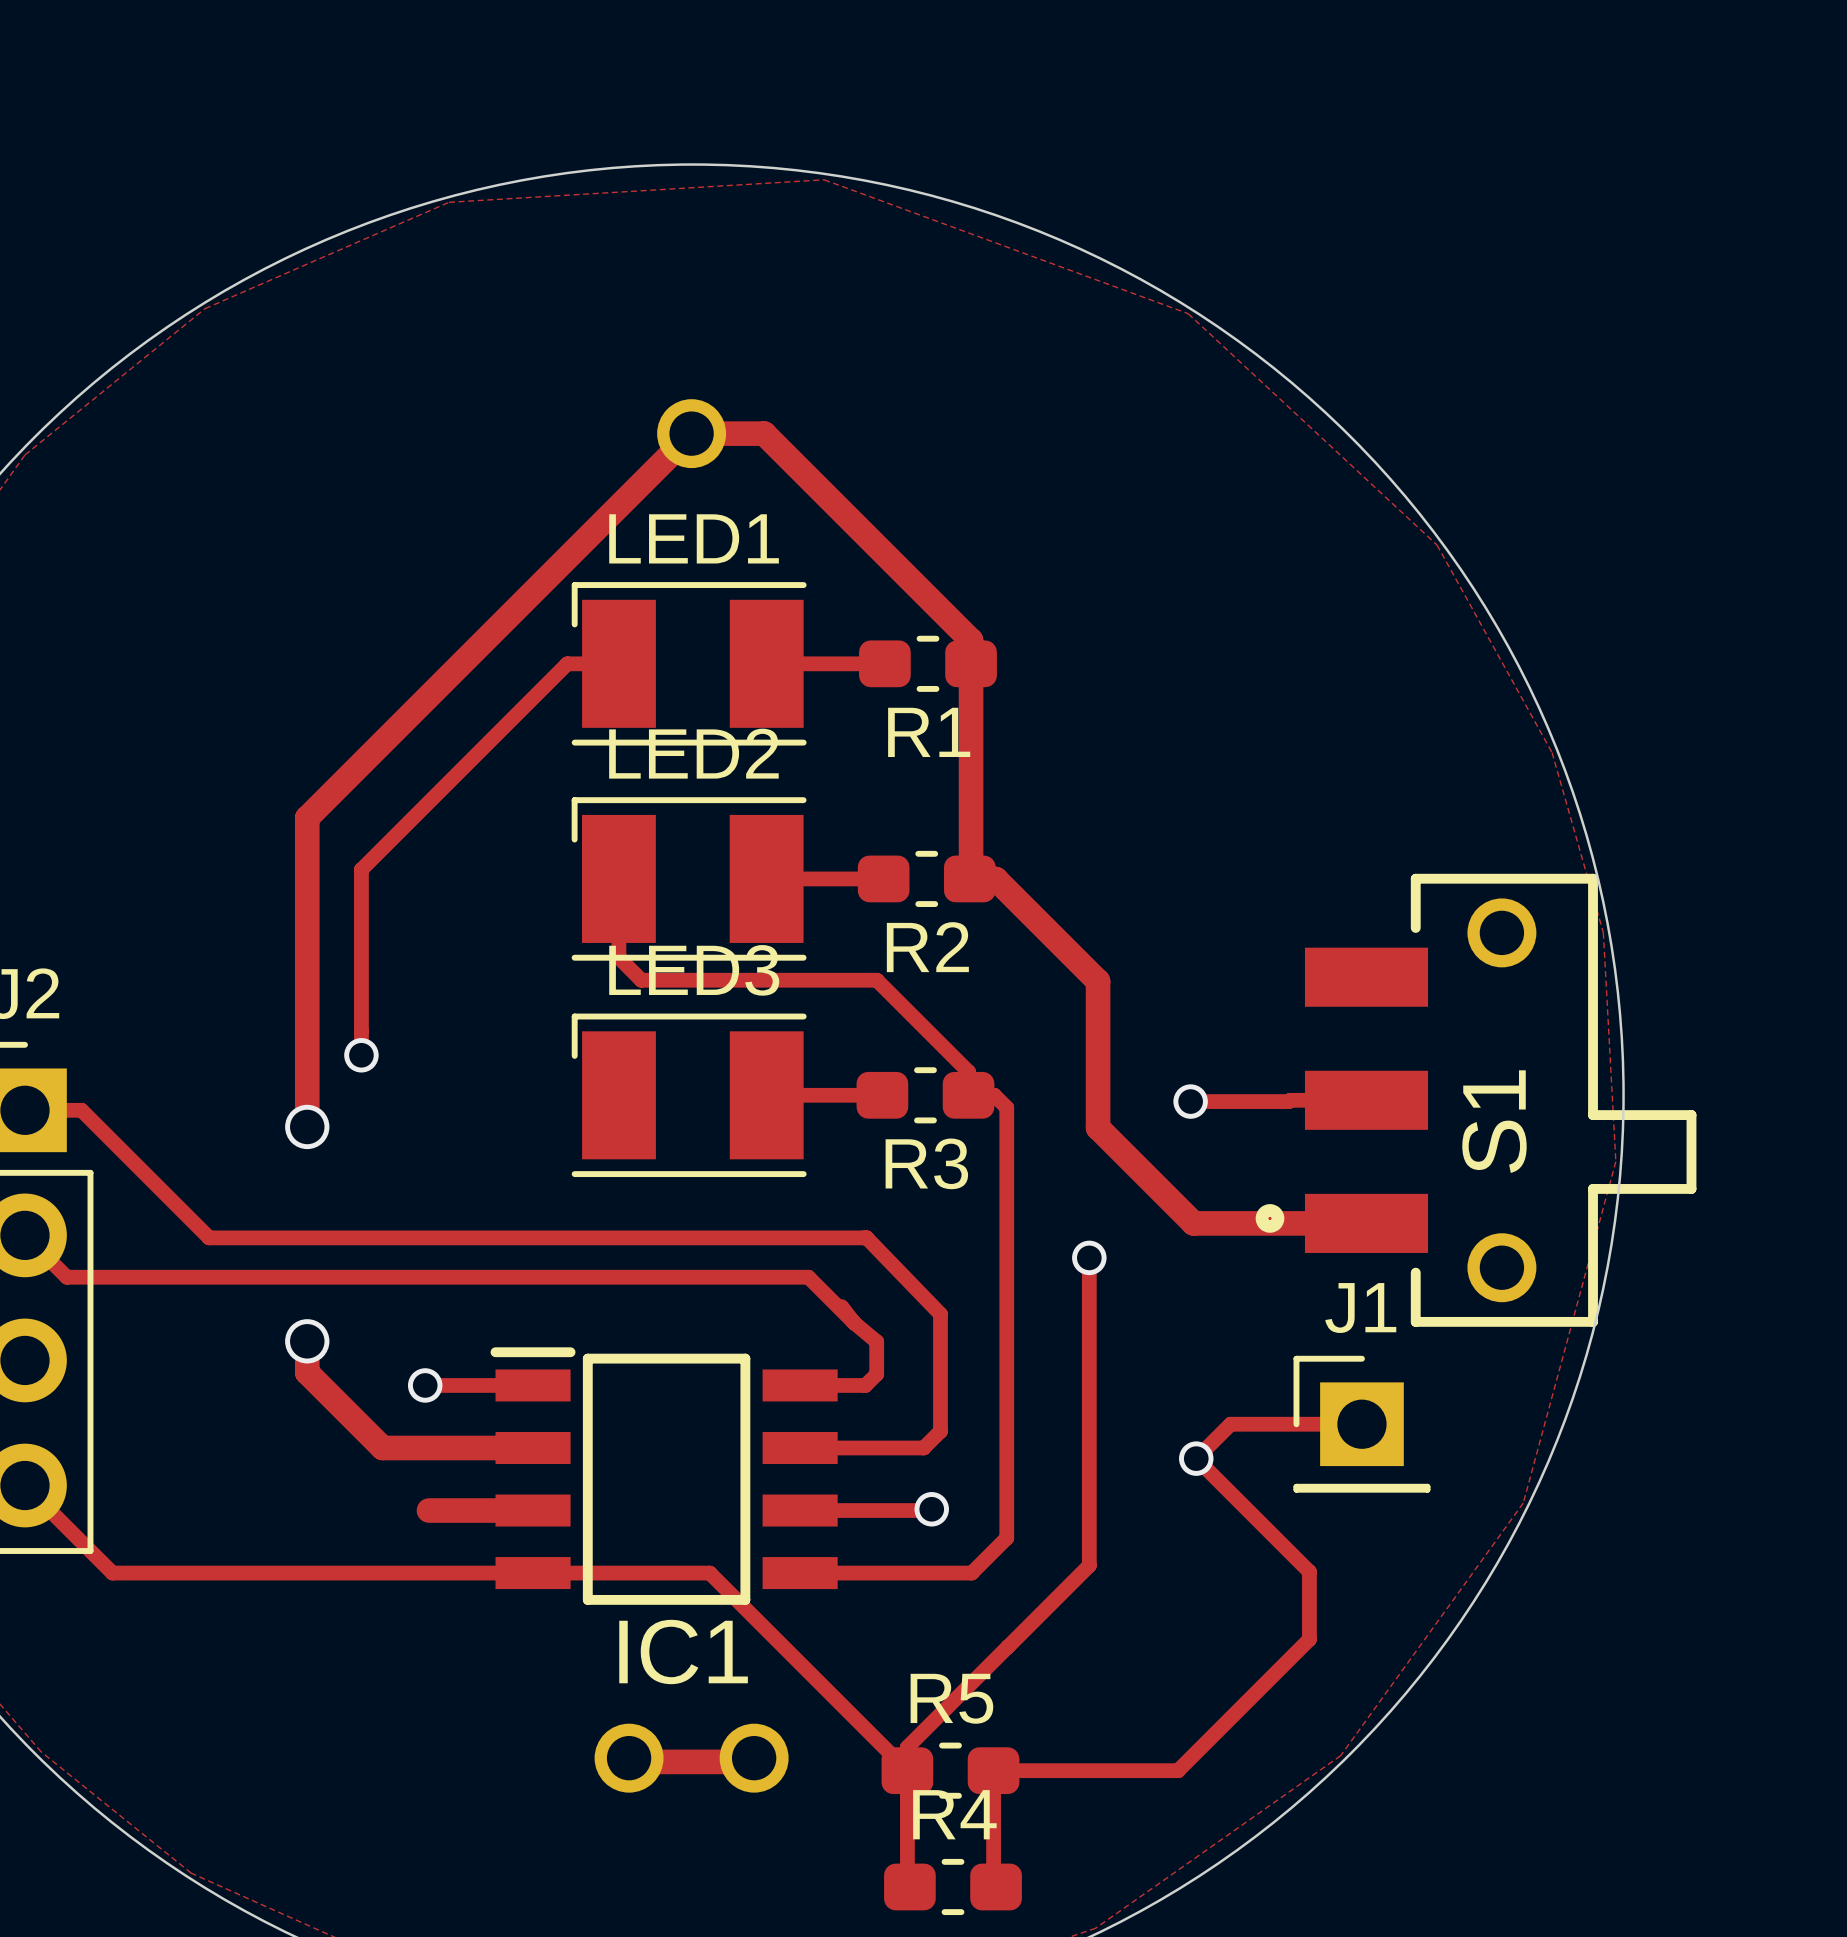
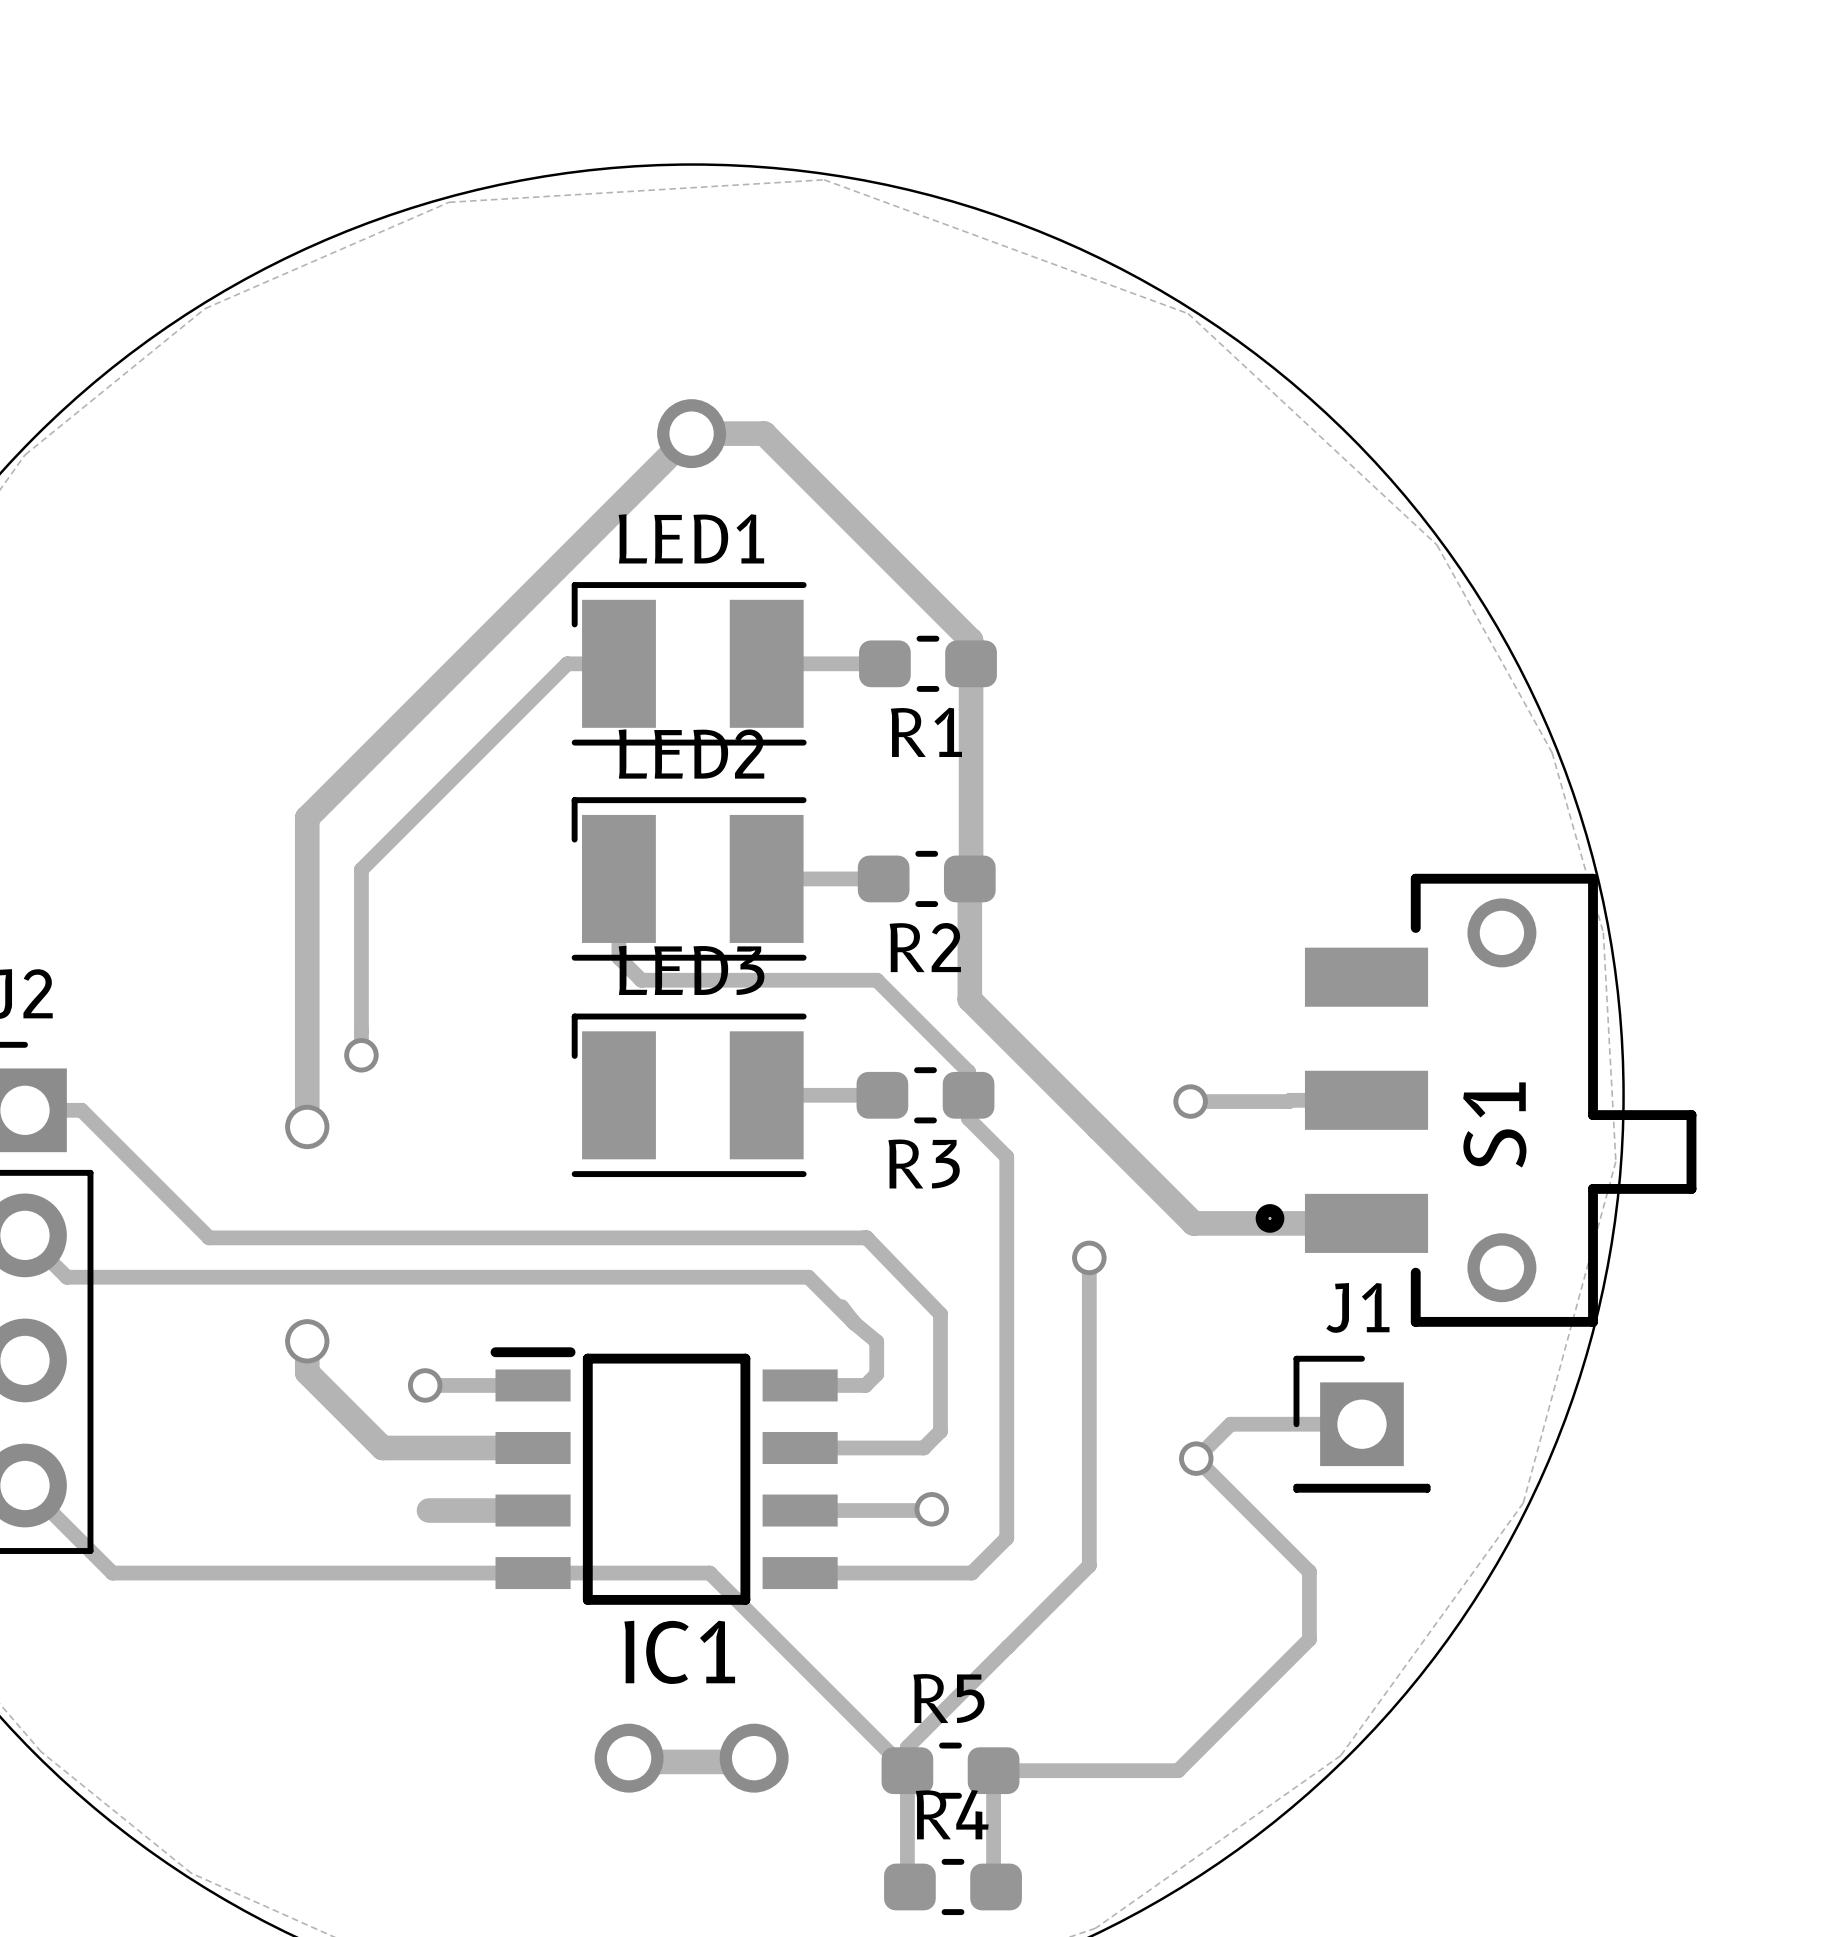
track: (969, 878) (995, 878) (1098, 981) (1098, 1127) -> (969, 878) (969, 999) (1098, 1127)
track: (968, 1095) (994, 1095) (1006, 1107) (1006, 1156) -> (968, 1095) (968, 1118) (1006, 1156)

